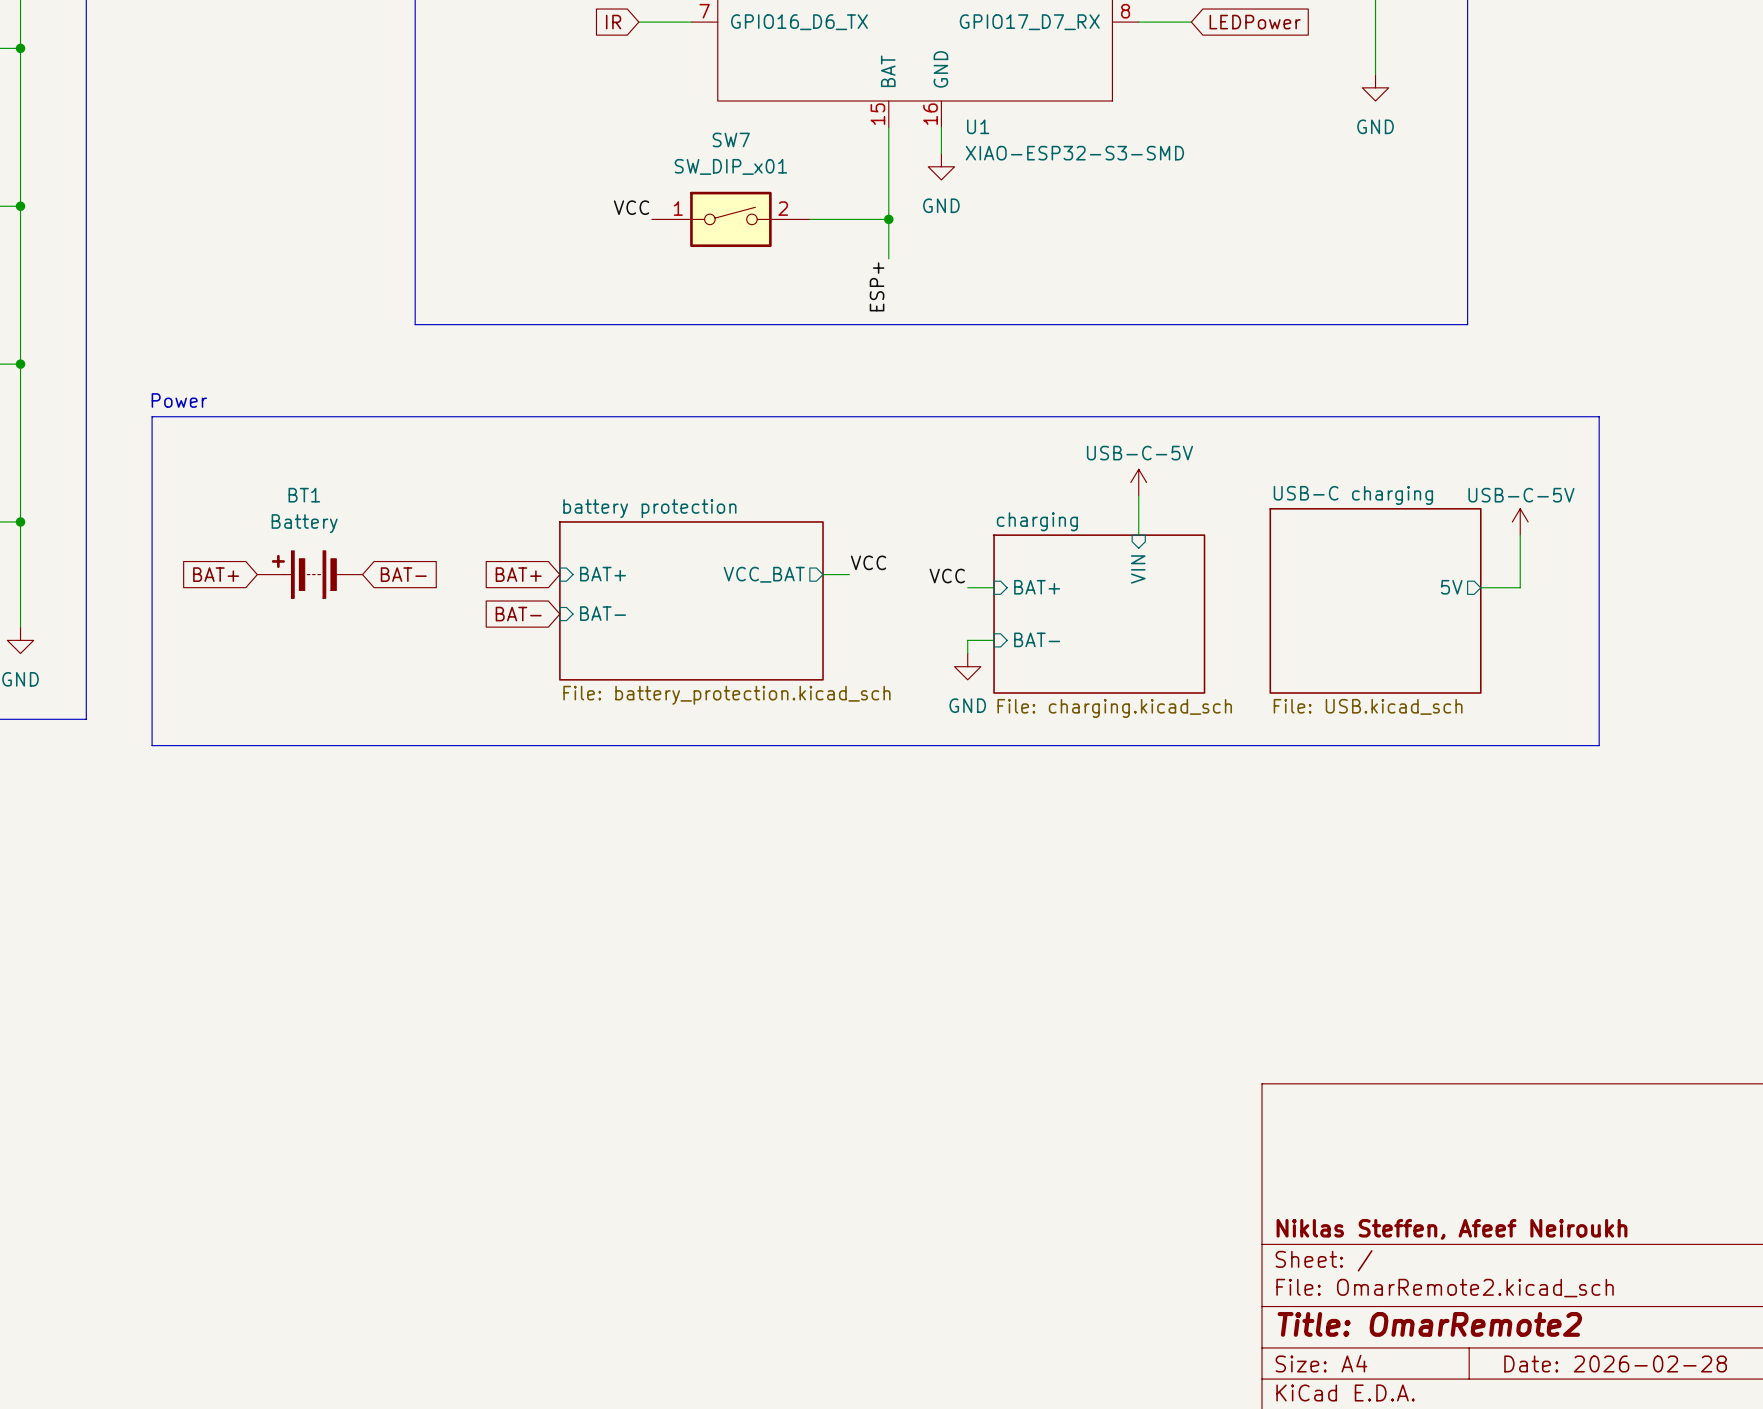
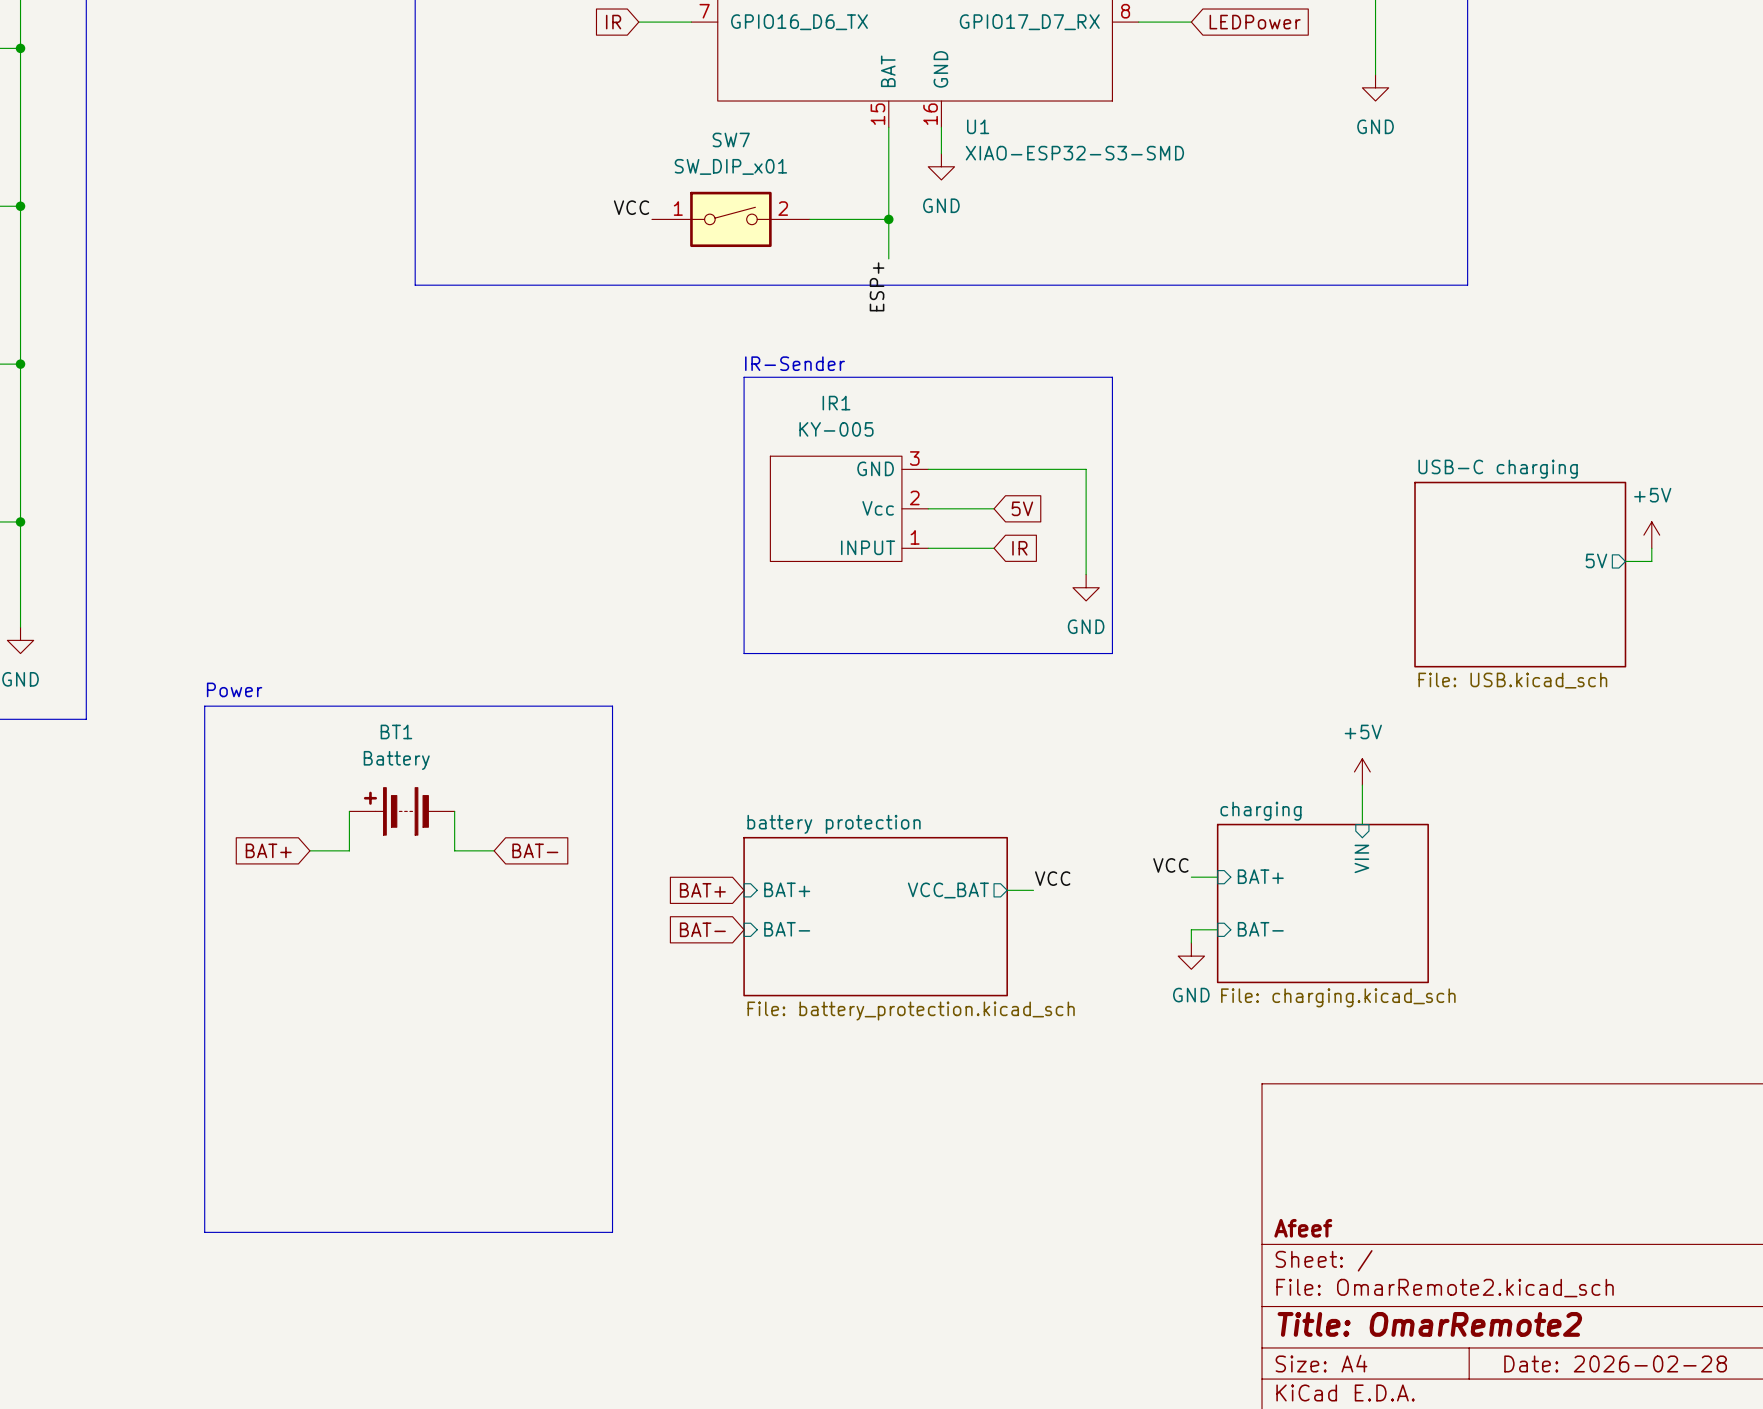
line: (415, 285) (415, 324) (1467, 324) (1467, 285) -> (415, 285) (1467, 285)
text: none -> IR-Sender (795, 363)
line: none -> (744, 377) (1112, 377) (1112, 653) (744, 653) (744, 377)
text: Power (179, 400) -> none
line: (152, 416) (1599, 416) (1599, 745) (152, 745) (152, 416) -> none
wire: none -> (928, 469) (1086, 469) (1086, 574)
power symbol: USB-C-5V (1138, 482) -> none
wire: (1138, 495) (1138, 535) -> none
IR1: none -> KY-005 (849, 508)
wire: none -> (928, 508) (994, 508)
global label: none -> 5V (1022, 508)
power symbol: USB-C-5V (1520, 521) -> none
wire: (1520, 535) (1520, 587) (1480, 587) -> none
power symbol: none -> +5V (1651, 535)
wire: none -> (928, 548) (994, 548)
global label: none -> IR (1019, 548)
wire: none -> (1651, 548) (1651, 561) (1625, 561)
label: VCC (868, 562) -> none
sheet pin: VIN (1138, 569) -> none
global label: BAT+ (216, 574) -> none
BT1 position: (309, 574) -> (402, 811)
global label: BAT- (403, 574) -> none
global label: BAT+ (518, 574) -> none
sheet pin: BAT+ (603, 574) -> none
sheet pin: VCC_BAT (764, 574) -> none
wire: (823, 574) (849, 574) -> none
label: VCC (947, 576) -> none
wire: (967, 587) (994, 587) -> none
sheet pin: BAT+ (1037, 587) -> none
sheet pin position: 5V (1451, 587) -> 5V (1596, 560)
sheet battery protection: File: battery_protection.kicad_sch (691, 600) -> none
sheet USB-C charging position: (1375, 600) -> (1520, 574)
sheet pin: BAT- (603, 613) -> none
global label: BAT- (518, 614) -> none
sheet charging: File: charging.kicad_sch (1099, 614) -> none
sheet pin: BAT- (1037, 639) -> none
wire: (994, 640) (967, 640) (967, 653) -> none
power symbol position: GND (967, 666) -> GND (1086, 587)
text: none -> Power (234, 689)
line: none -> (204, 706) (612, 706) (612, 1232) (204, 1232) (204, 706)
power symbol: none -> +5V (1362, 771)
wire: none -> (1362, 785) (1362, 824)
wire: none -> (349, 811) (349, 850) (309, 850)
wire: none -> (454, 811) (454, 850) (494, 850)
global label: none -> BAT+ (268, 850)
global label: none -> BAT- (535, 850)
sheet pin: none -> VIN (1361, 858)
label: none -> VCC (1170, 865)
sheet pin: none -> BAT+ (1260, 876)
wire: none -> (1191, 877) (1217, 877)
label: none -> VCC (1052, 878)
sheet pin: none -> BAT+ (787, 889)
global label: none -> BAT+ (702, 890)
sheet pin: none -> VCC_BAT (948, 890)
wire: none -> (1007, 890) (1033, 890)
sheet charging: none -> File: charging.kicad_sch (1322, 903)
sheet battery protection: none -> File: battery_protection.kicad_sch (875, 916)
global label: none -> BAT- (702, 929)
sheet pin: none -> BAT- (787, 929)
wire: none -> (1217, 929) (1191, 929) (1191, 942)
sheet pin: none -> BAT- (1260, 929)
power symbol: none -> GND (1191, 956)
title block: Niklas Steffen, Afeef Neiroukh (1451, 1229) -> Afeef (1303, 1228)

